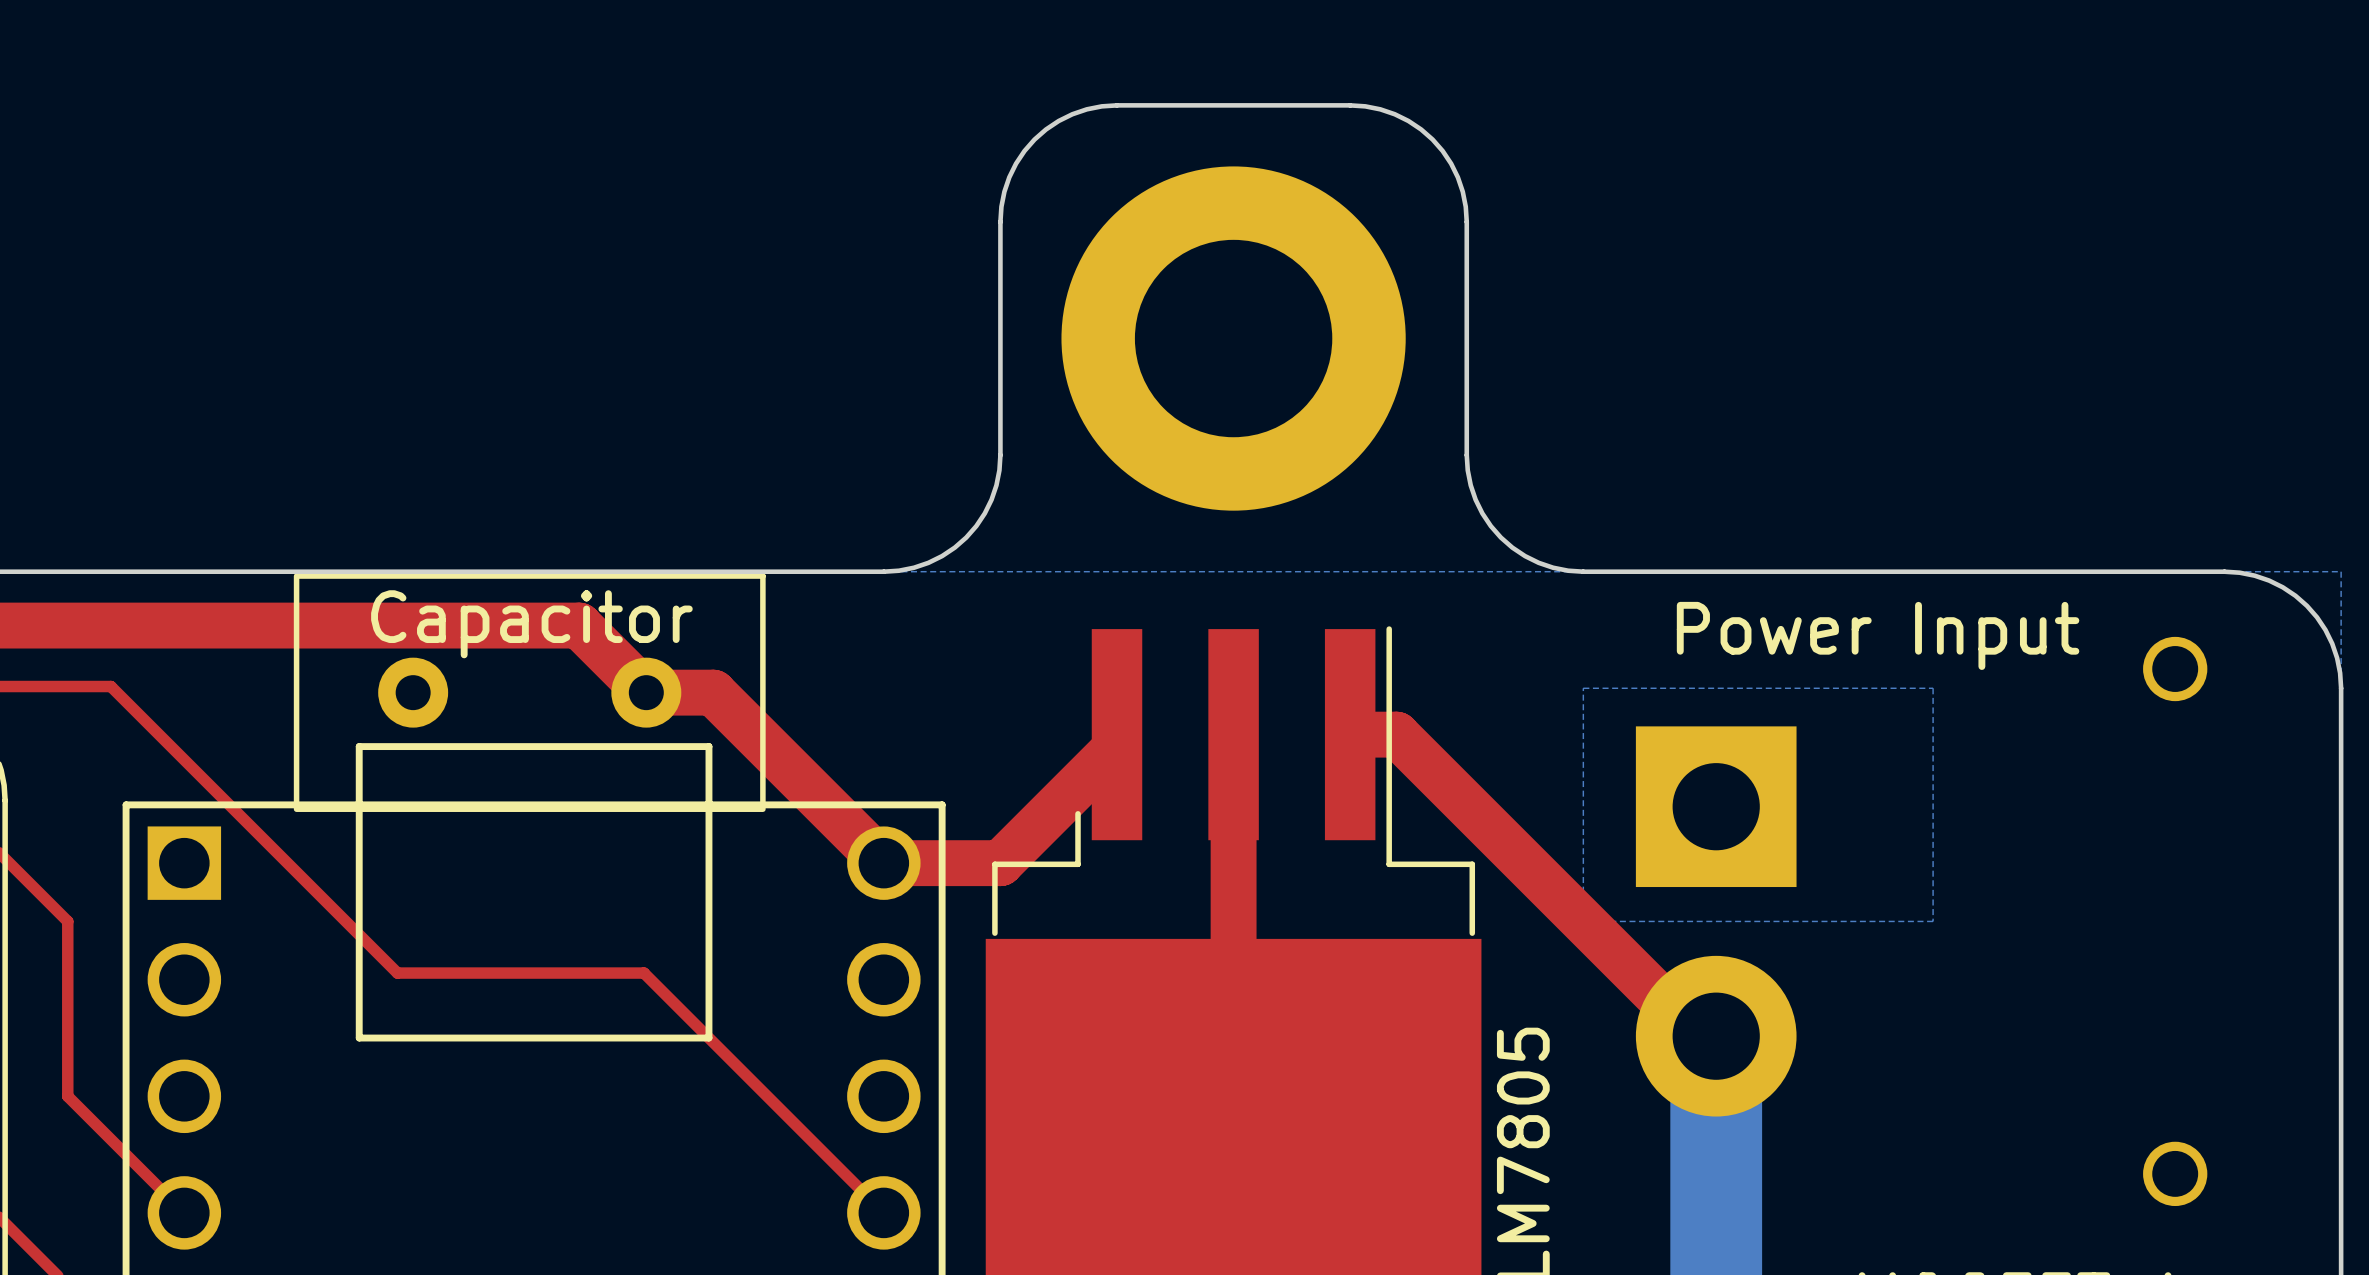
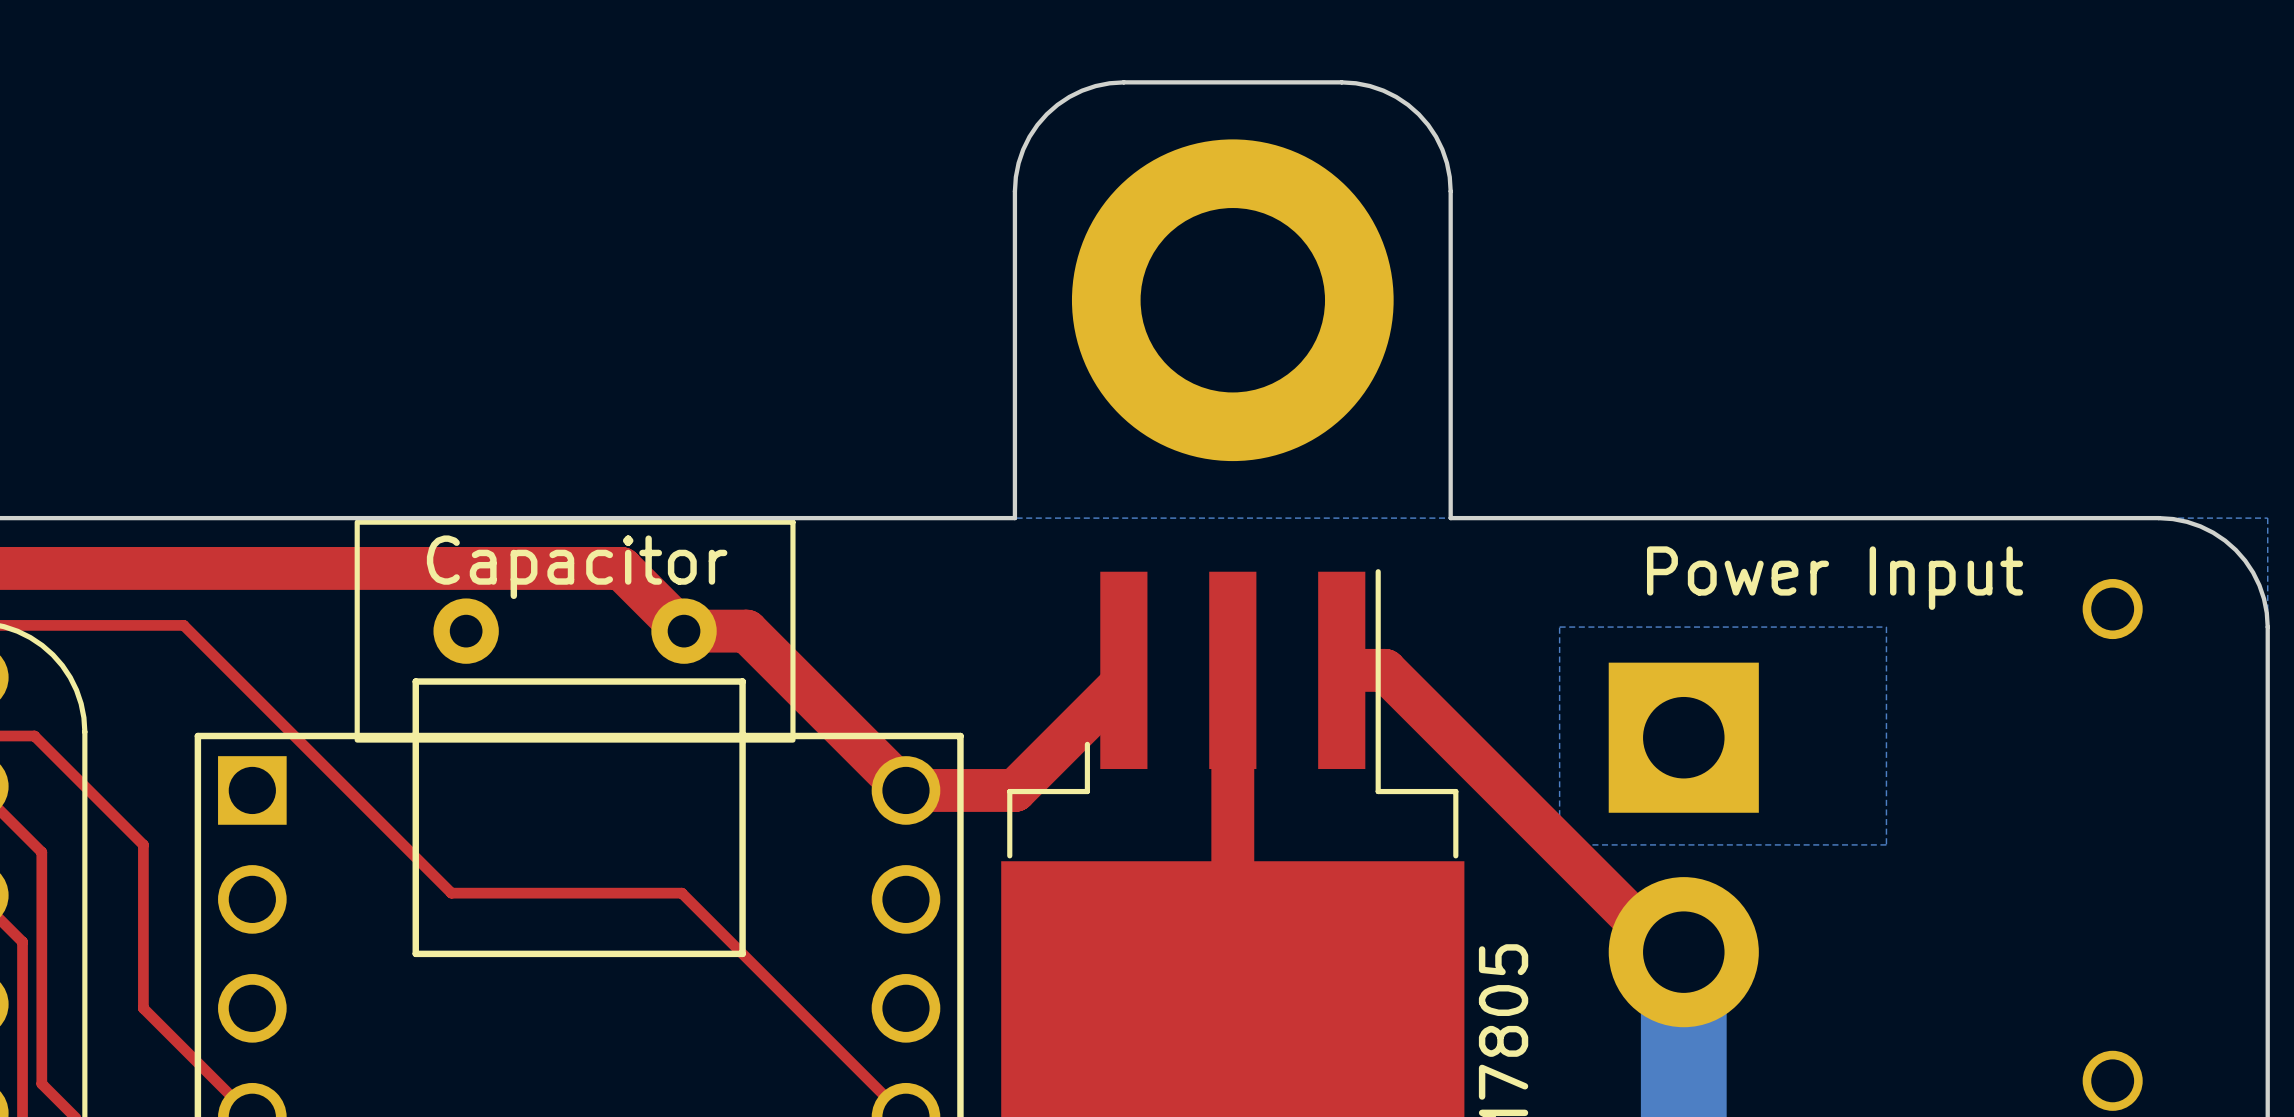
board edge: (1000, 455) (999, 470) (991, 499) (976, 526) (966, 537) (942, 556) (928, 562) (914, 567) (883, 571) -> (1014, 409) (1014, 518) (905, 518)
board edge: (1466, 455) (1467, 470) (1475, 499) (1482, 513) (1500, 537) (1512, 547) (1538, 562) (1568, 570) (1583, 571) -> (1450, 409) (1450, 518) (1559, 518)

